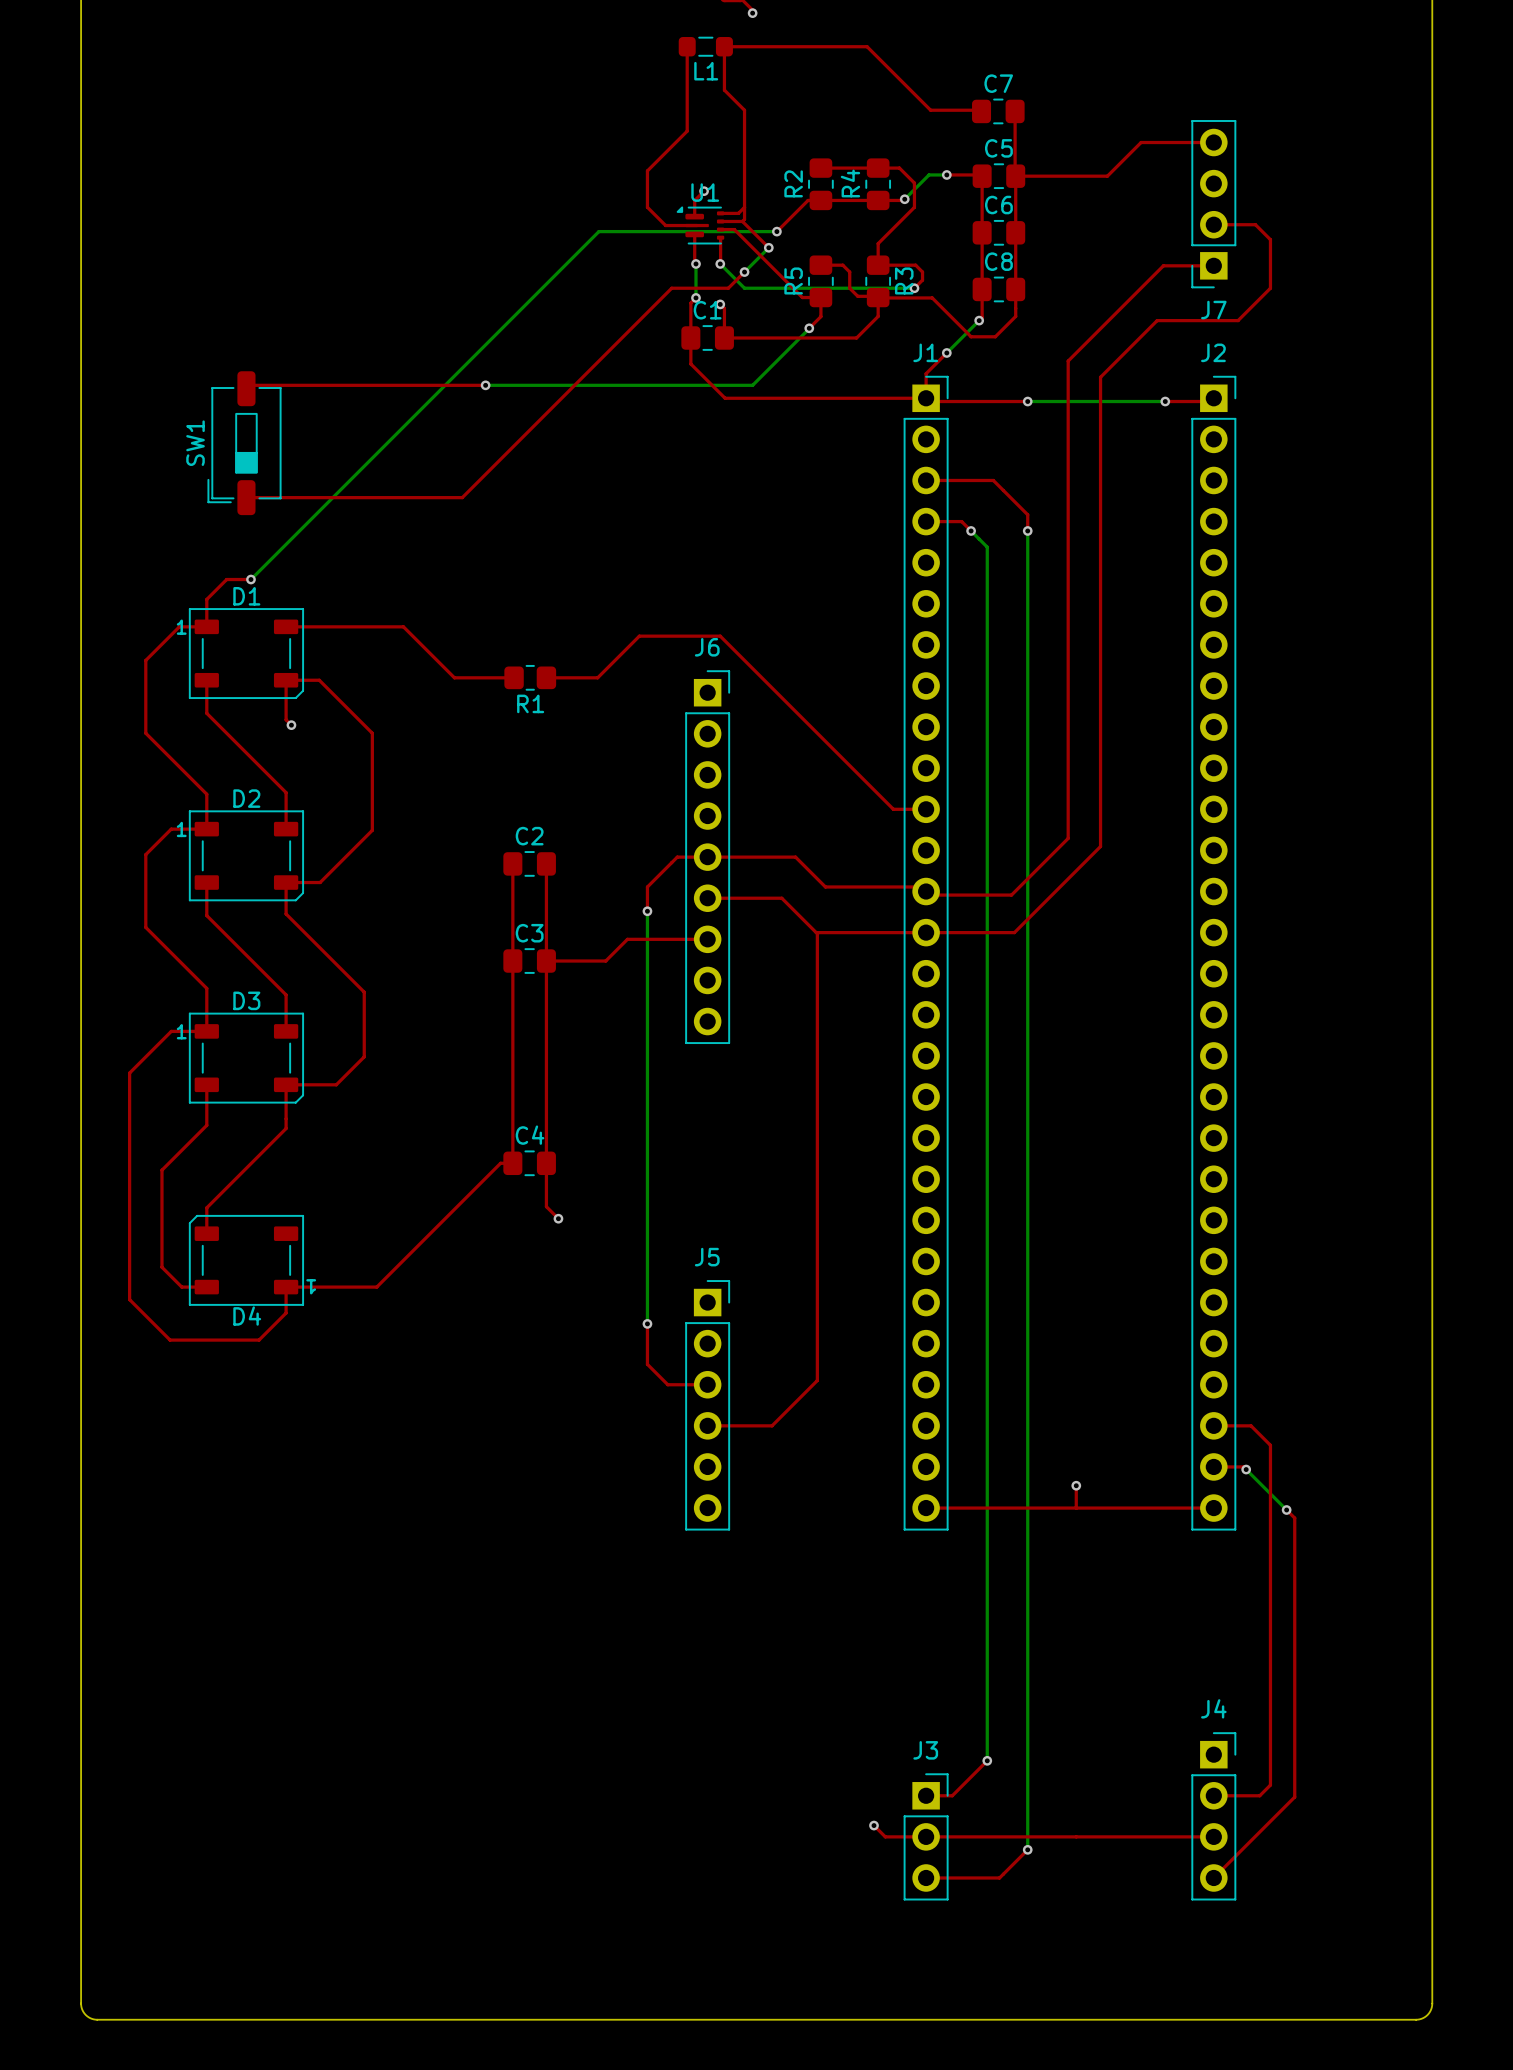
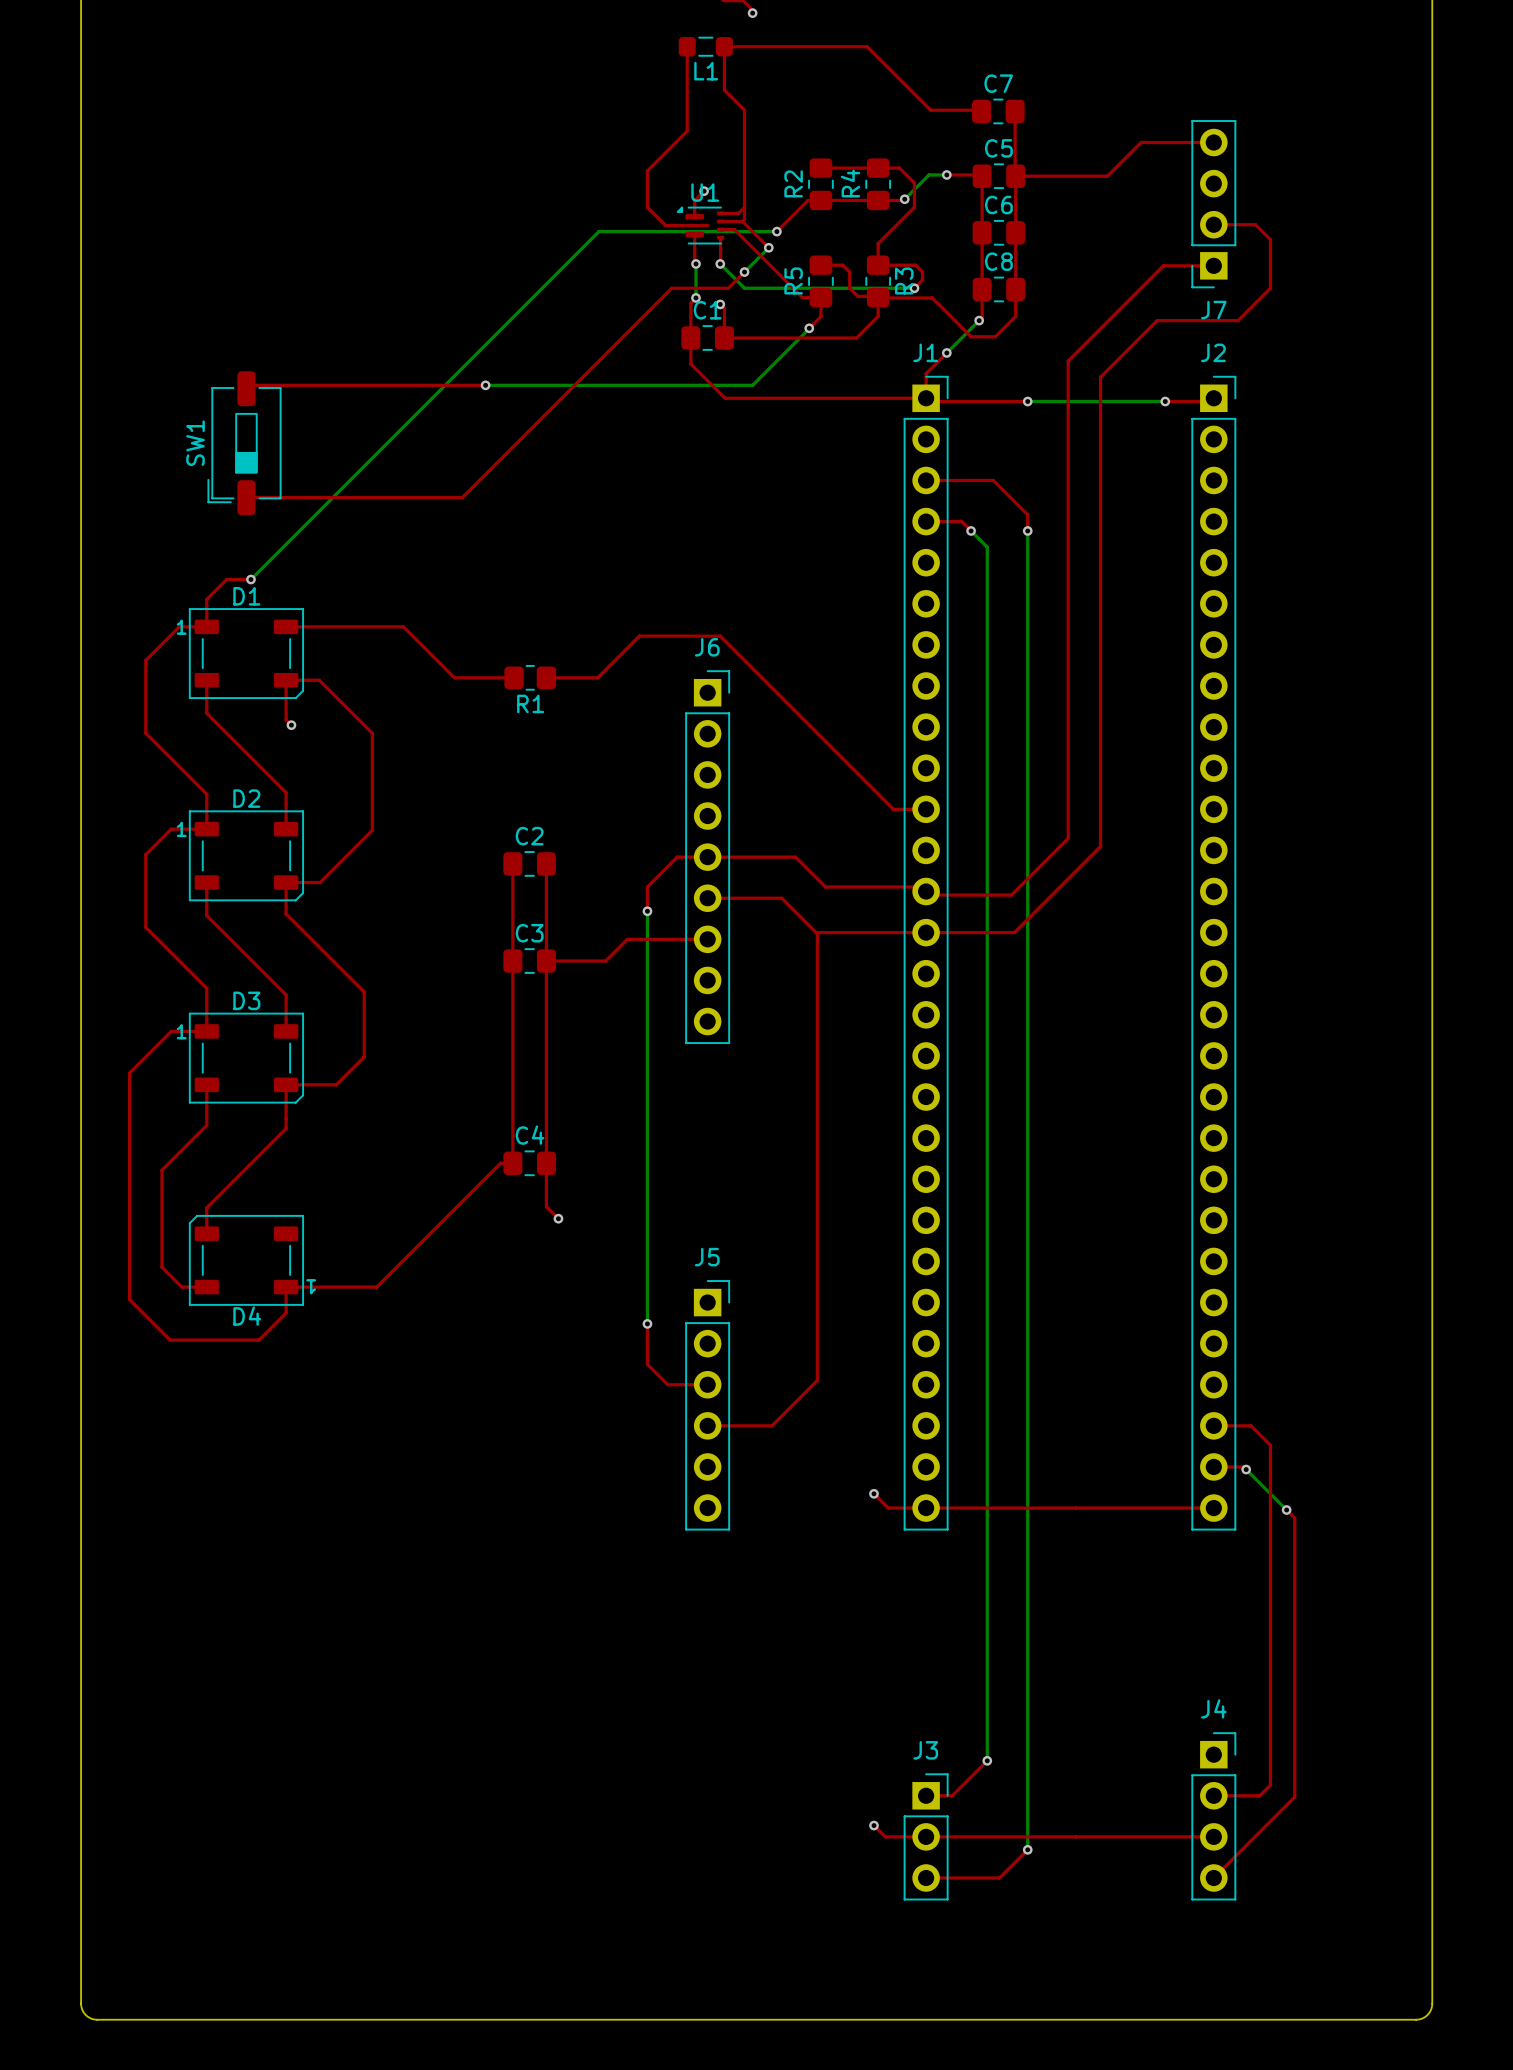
top track: (1076, 1485) (1076, 1508) -> none
via: (1076, 1485) -> none
top track: none -> (874, 1493) (888, 1508) (926, 1508)
via: none -> (874, 1493)

